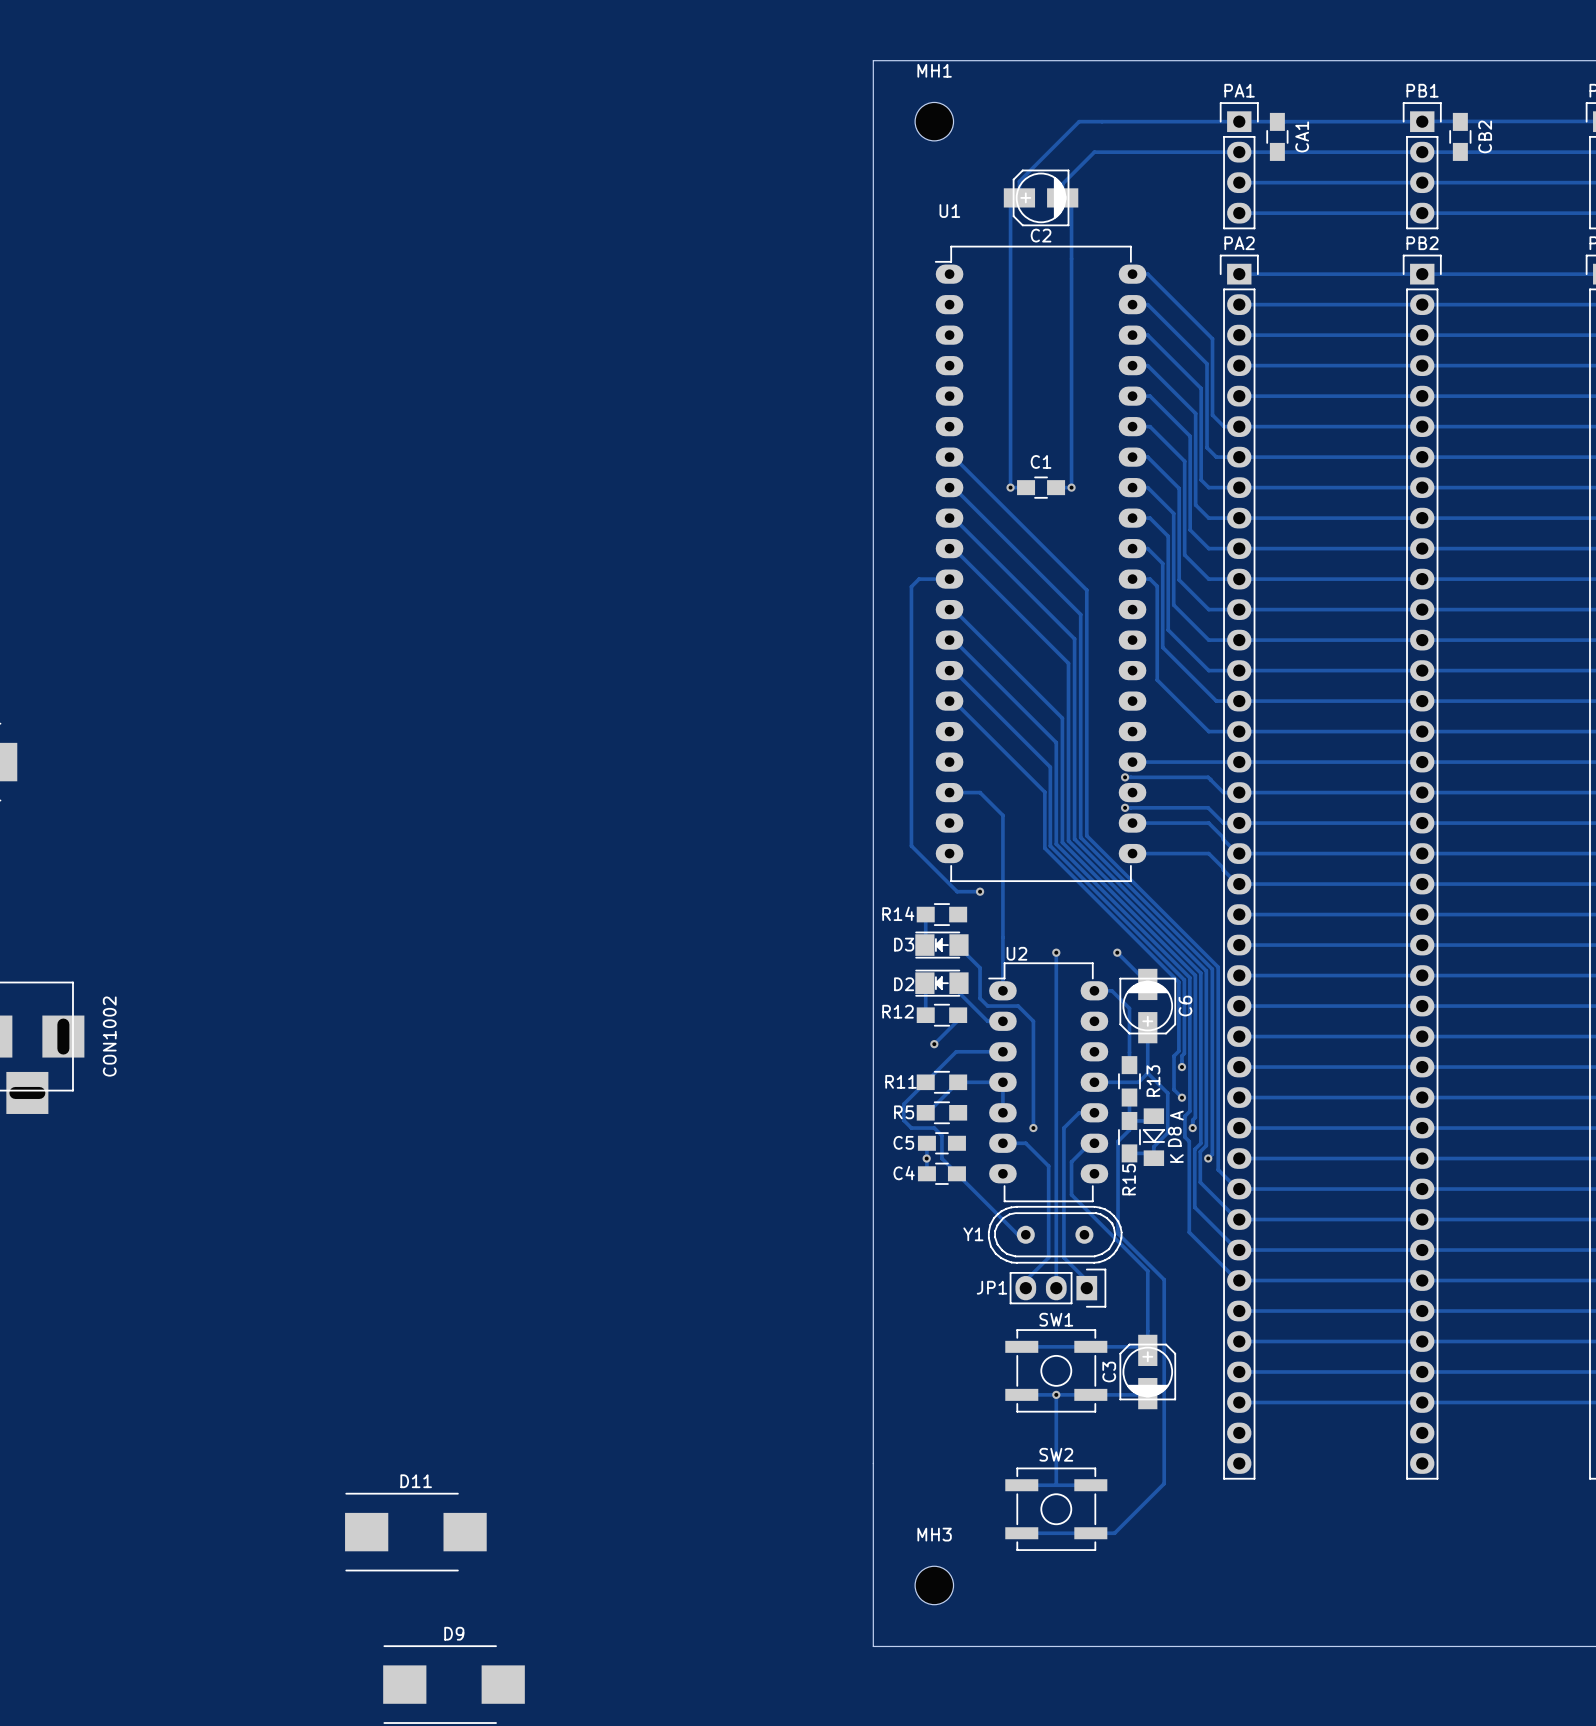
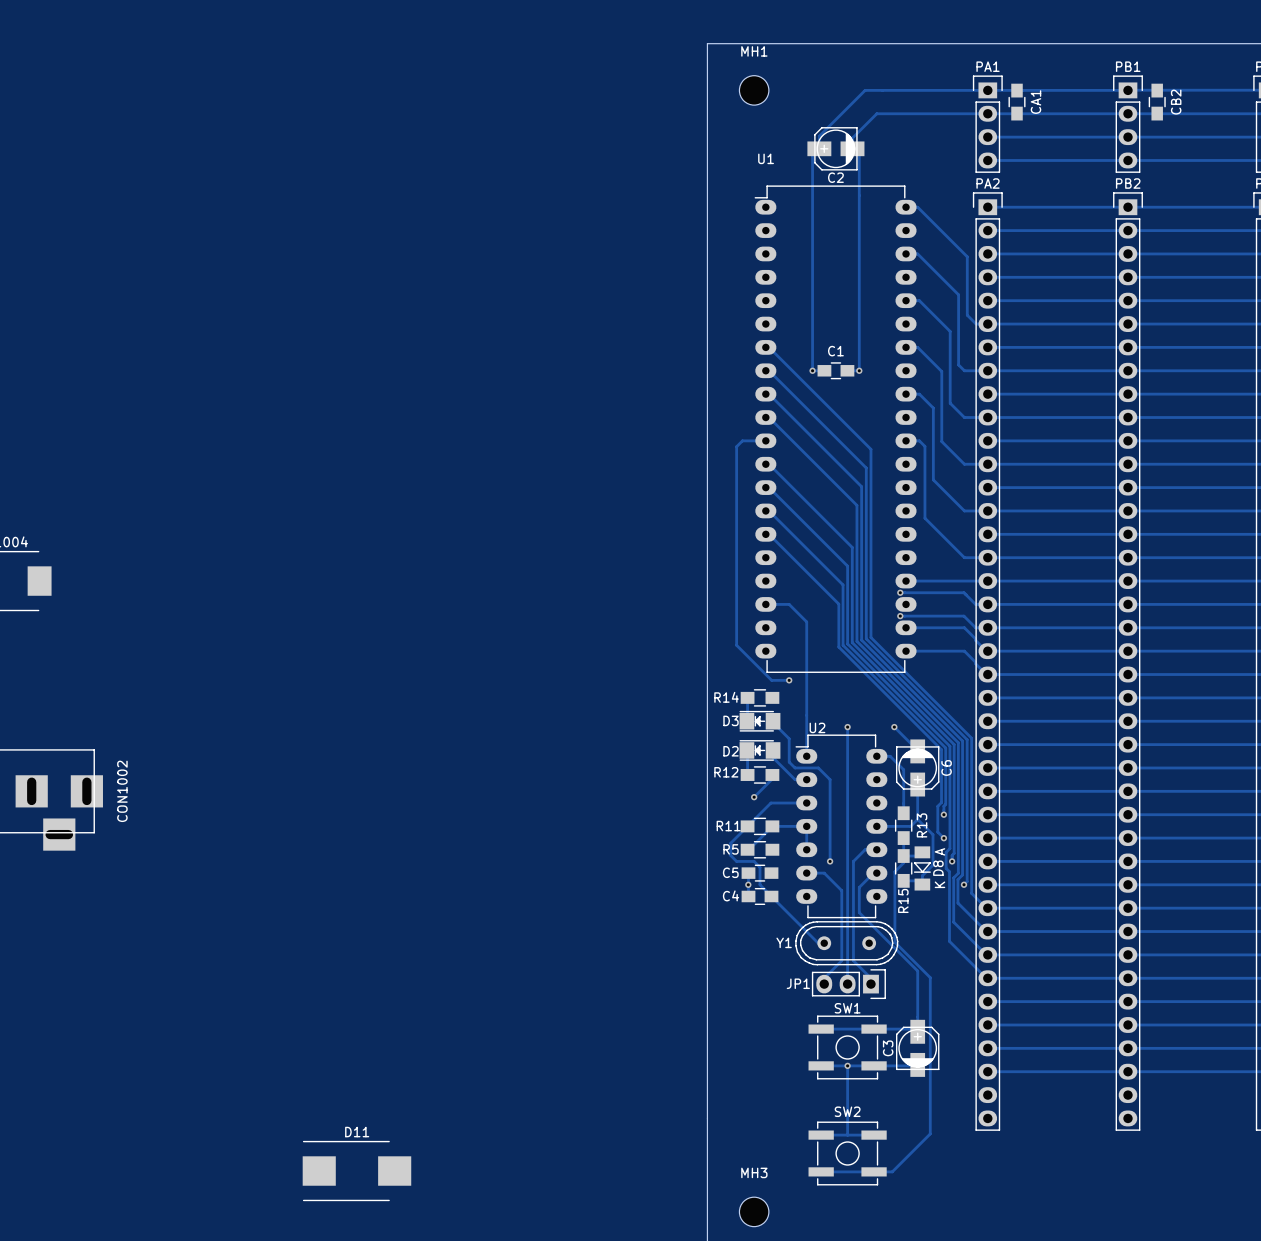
track: (1132, 304) (1147, 304) (1207, 363) (1207, 447) (1216, 457) (1239, 457) -> none
track: (1132, 365) (1147, 365) (1195, 413) (1195, 505) (1208, 518) (1239, 518) -> none
track: (1132, 426) (1150, 426) (1184, 461) (1184, 555) (1208, 579) (1239, 579) -> none
track: (1132, 487) (1147, 487) (1173, 513) (1173, 605) (1208, 640) (1239, 640) -> none
track: (1132, 548) (1147, 548) (1162, 563) (1162, 647) (1216, 701) (1239, 701) -> none

